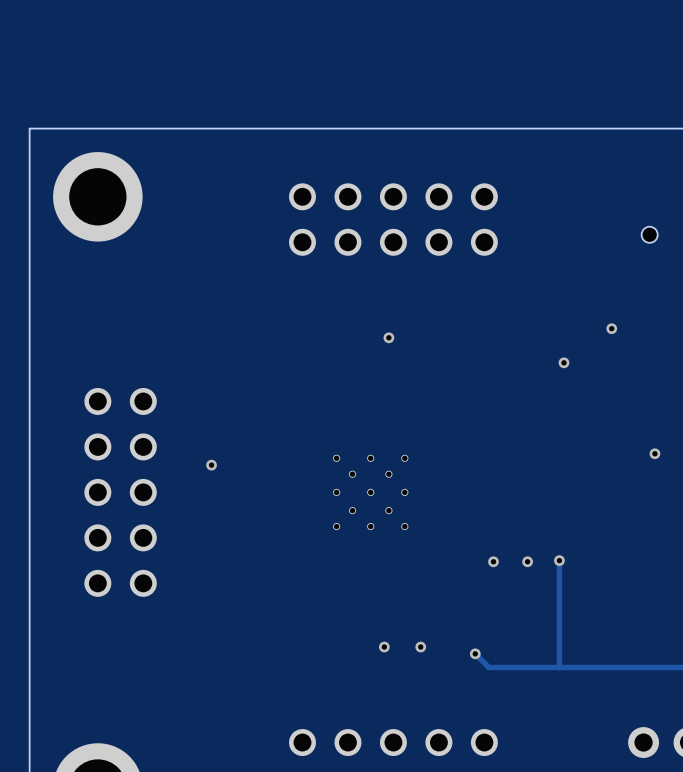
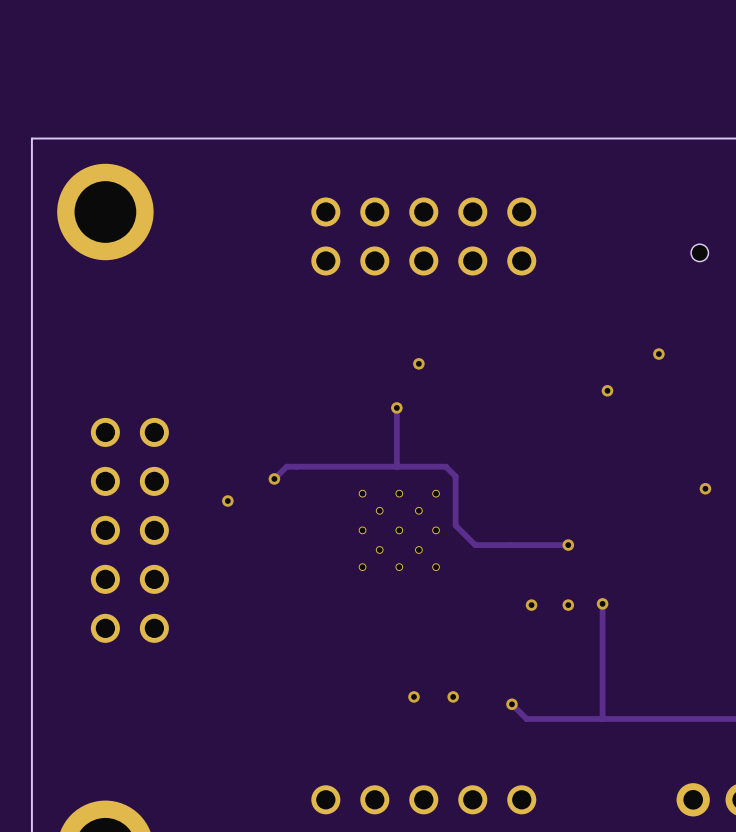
track: none -> (396, 407) (396, 466)
via: none -> (396, 407)
track: none -> (274, 478) (286, 466) (445, 466) (455, 476) (455, 525) (475, 545) (568, 545)
via: none -> (274, 478)
via: none -> (568, 545)

